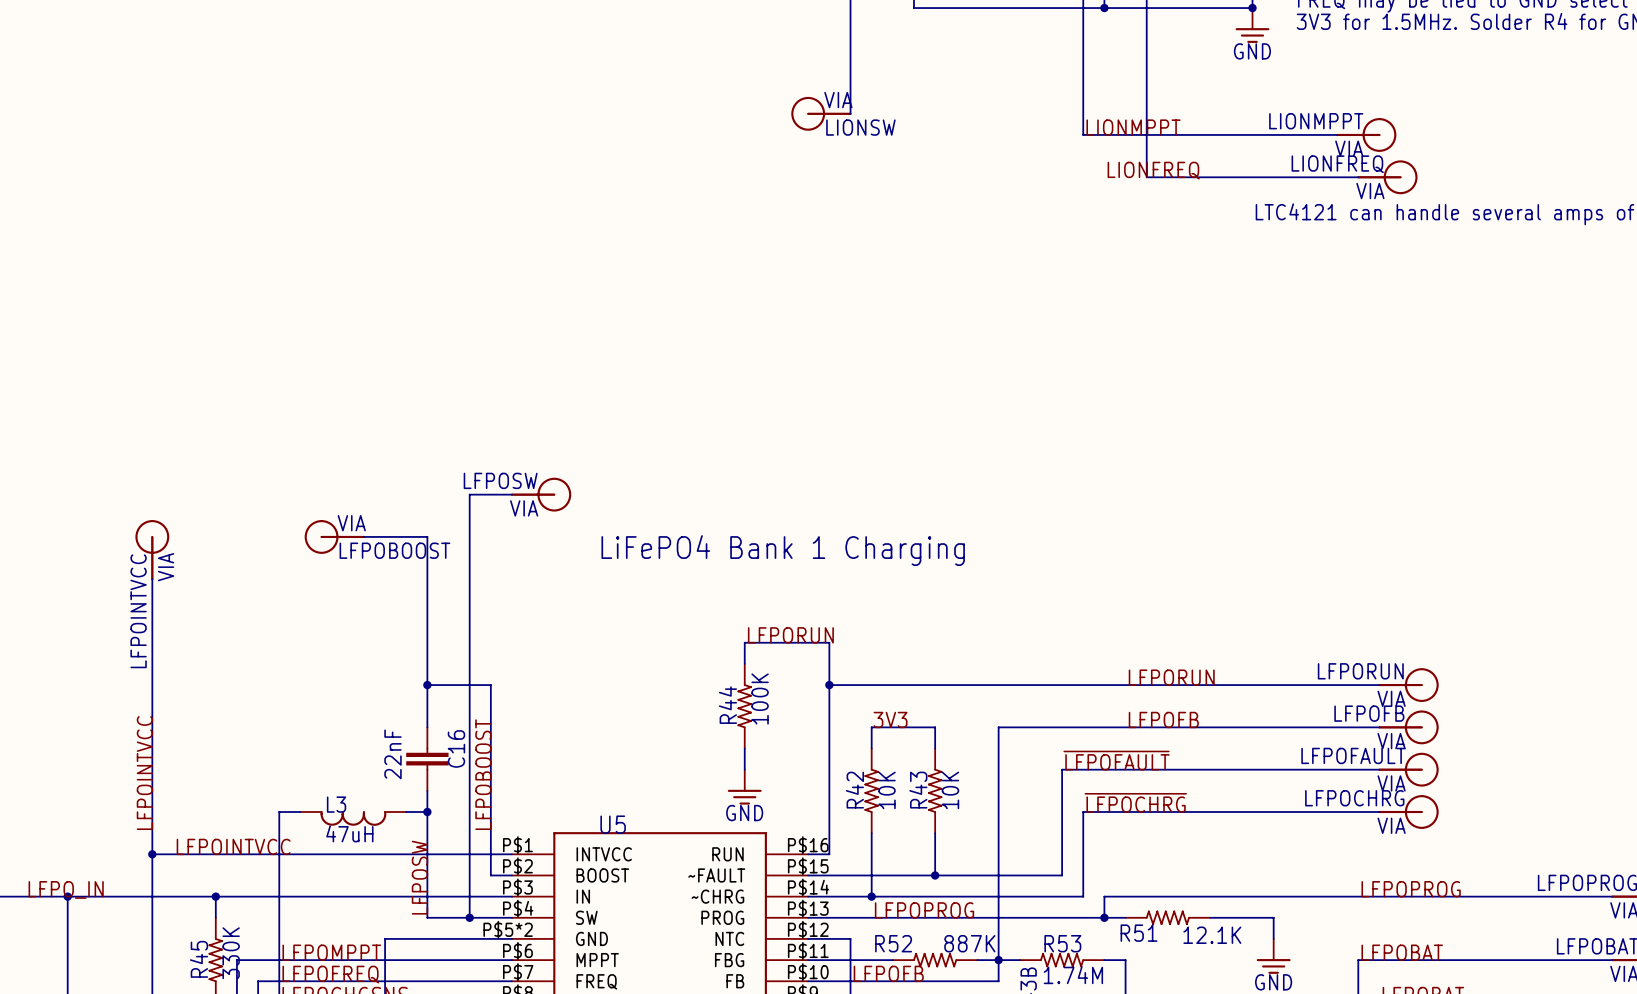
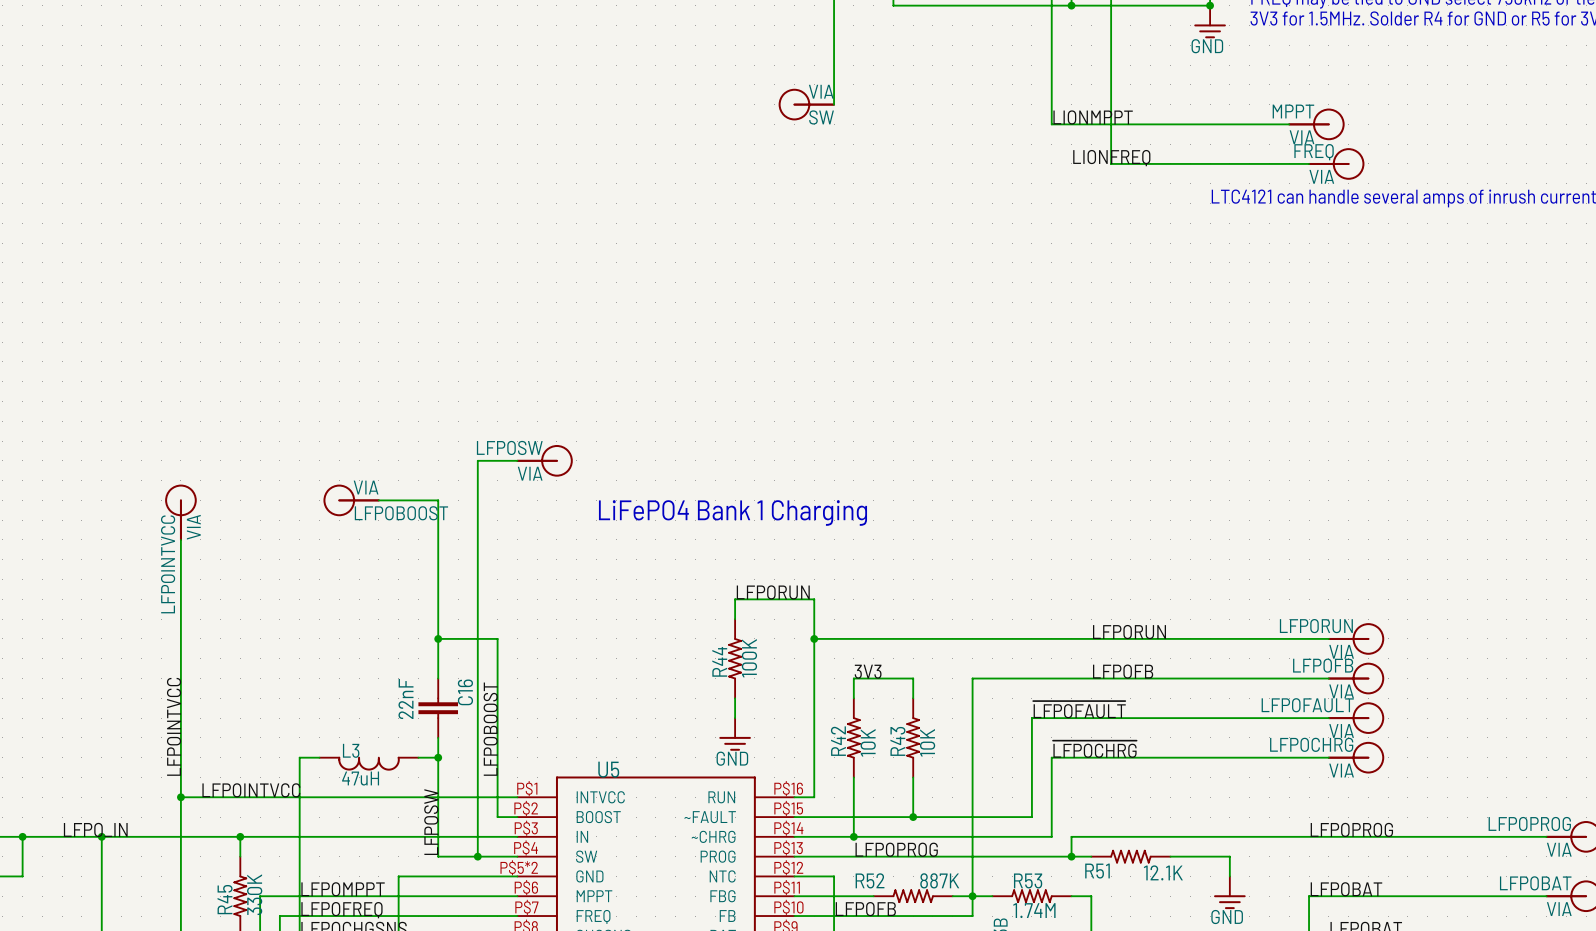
part value: LIONMPPT (1316, 121) -> MPPT (1293, 111)
part value: LIONSW (860, 127) -> SW (821, 117)
part value: LIONFREQ (1337, 164) -> FREQ (1314, 152)

